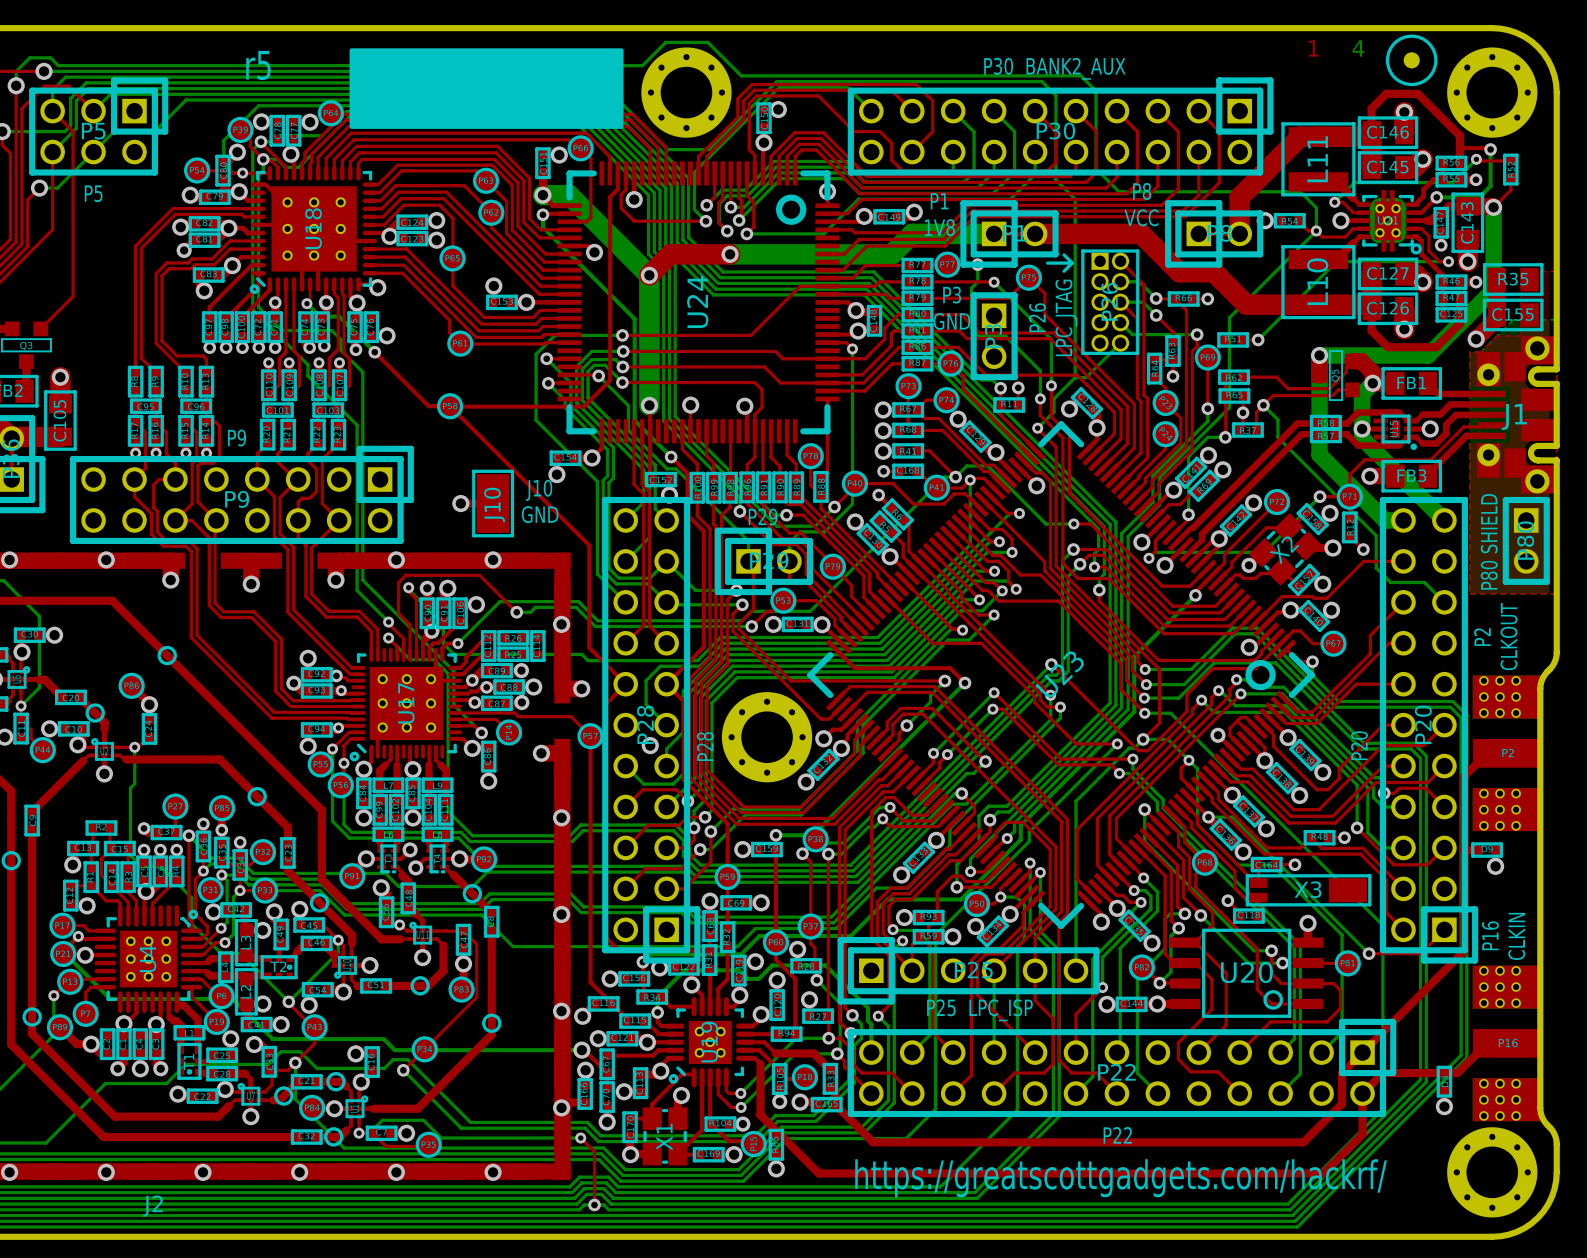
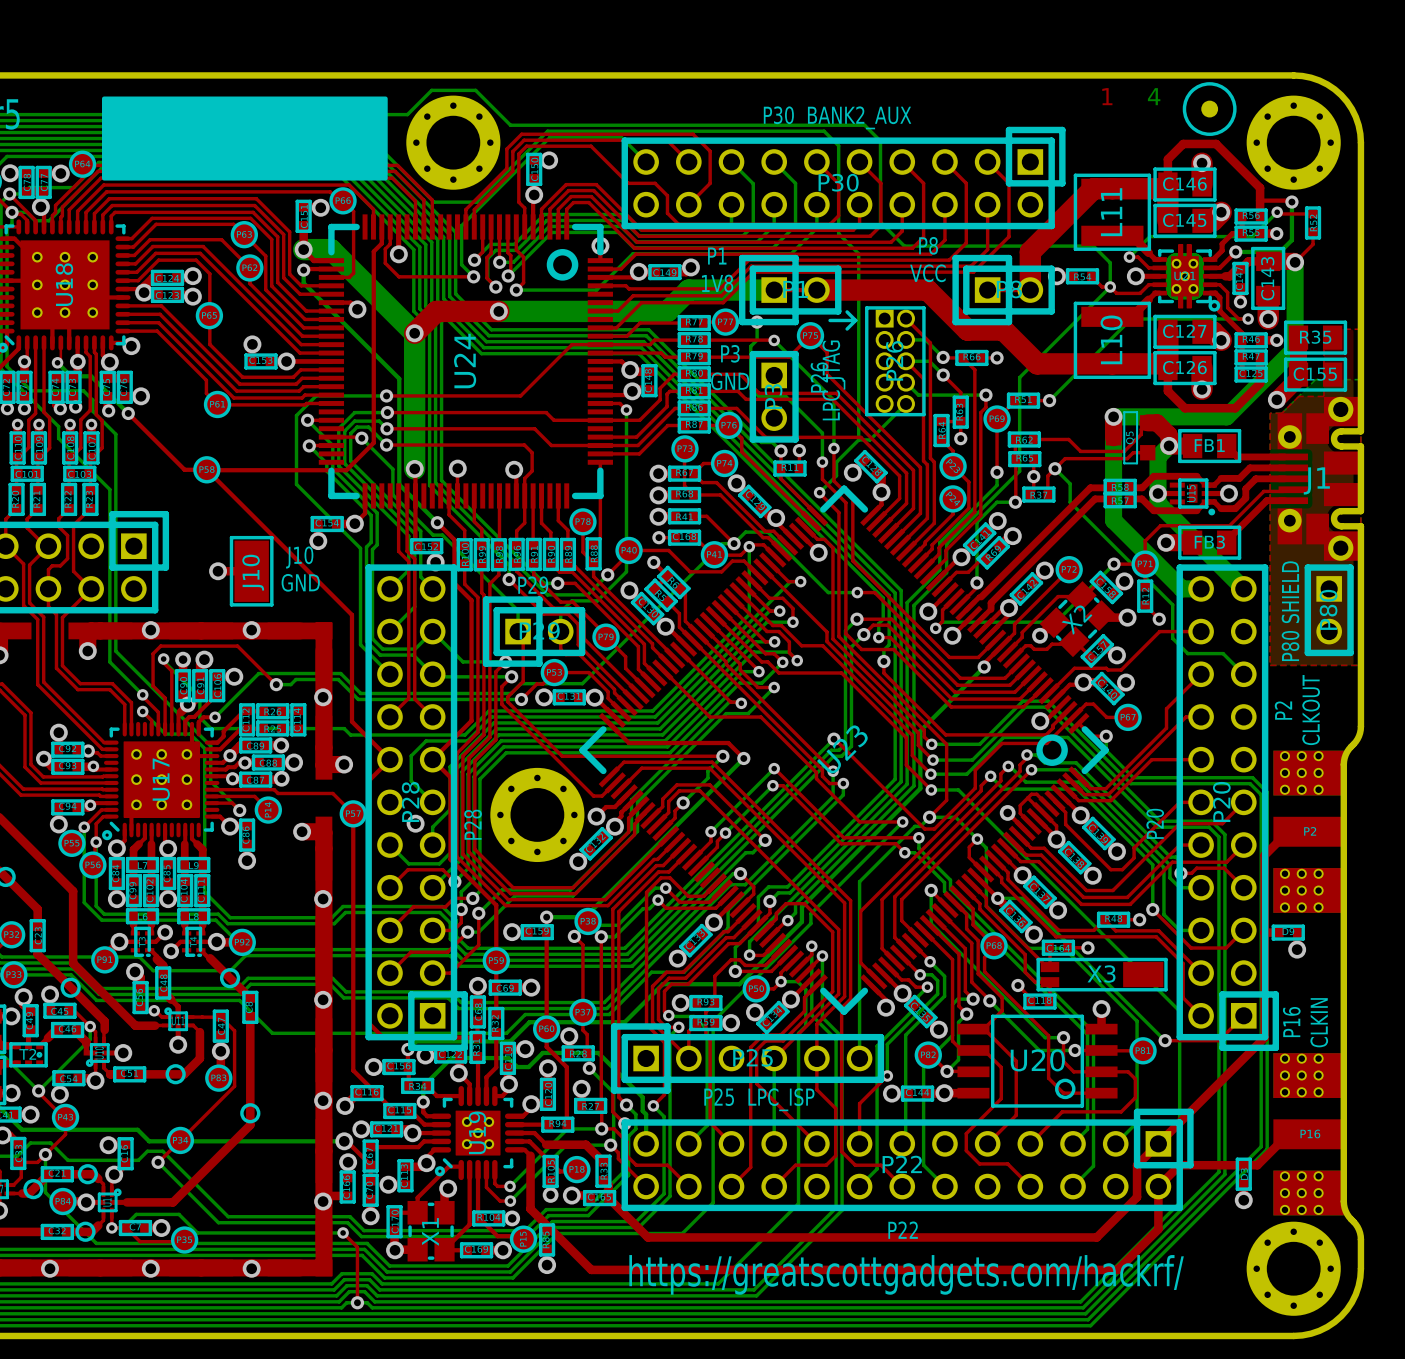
text position: LPC_JTAG (1066, 317) -> LPC_JTAG (833, 380)

